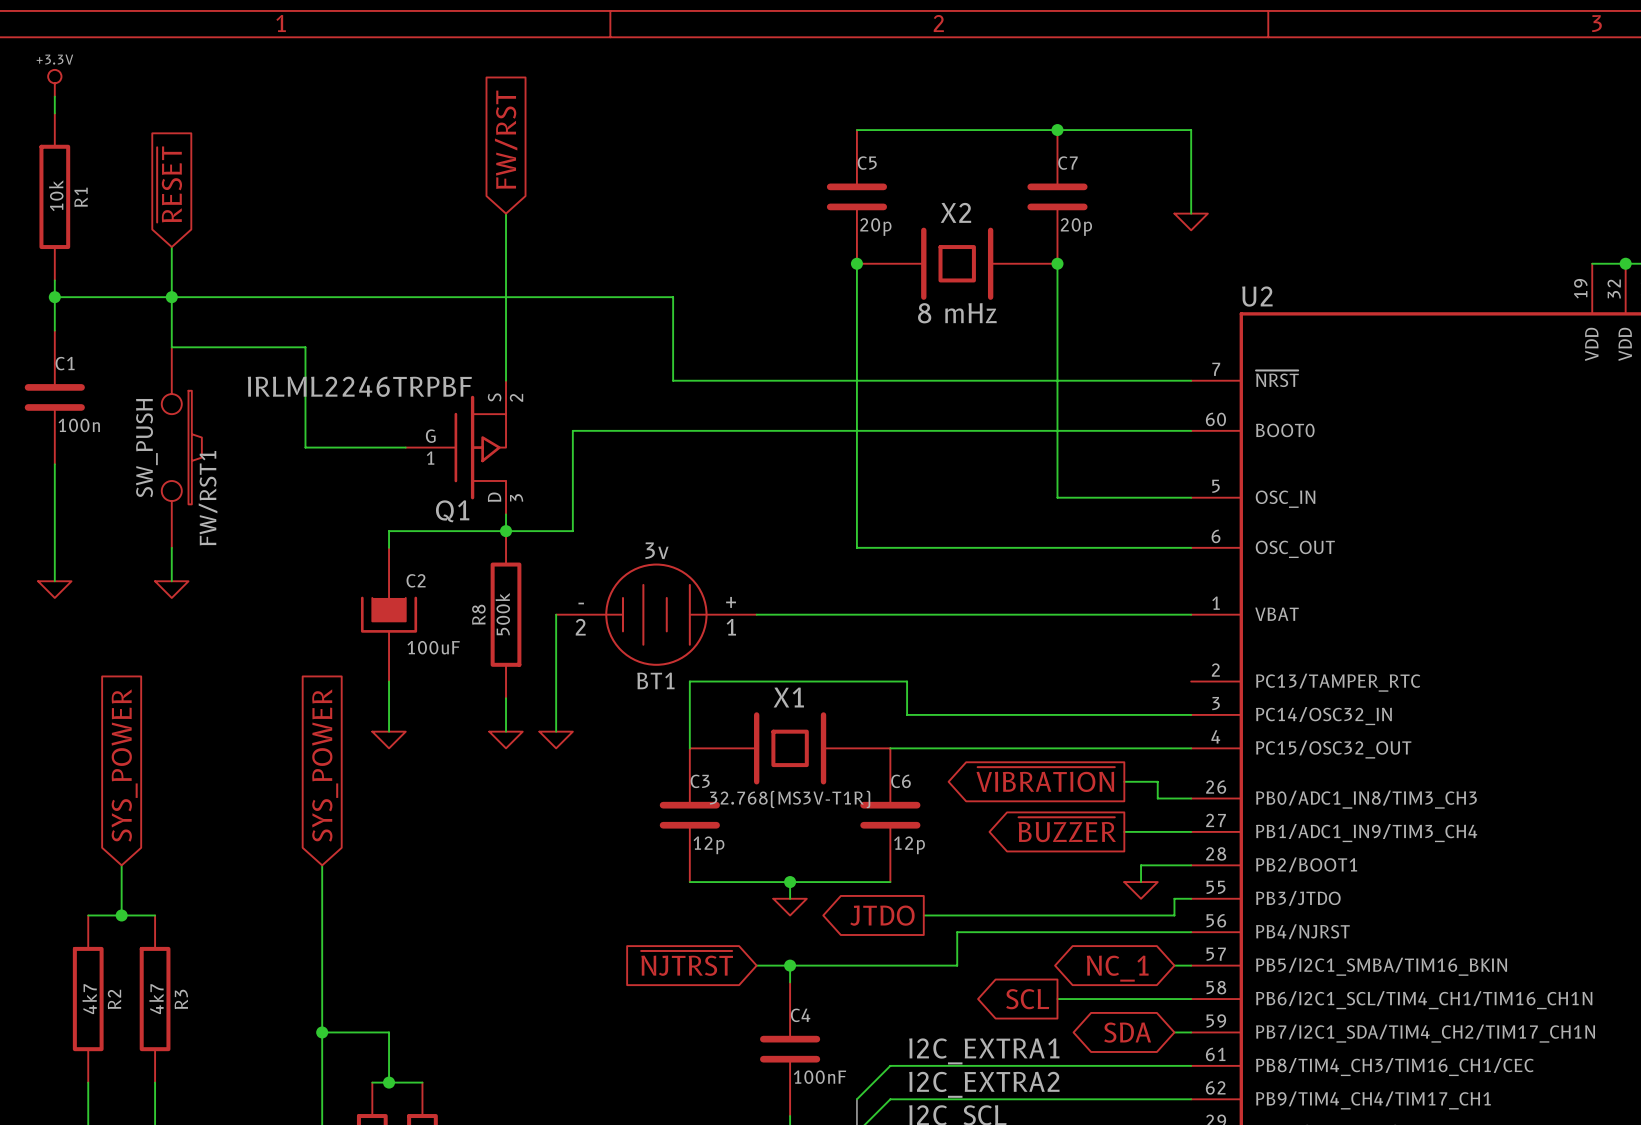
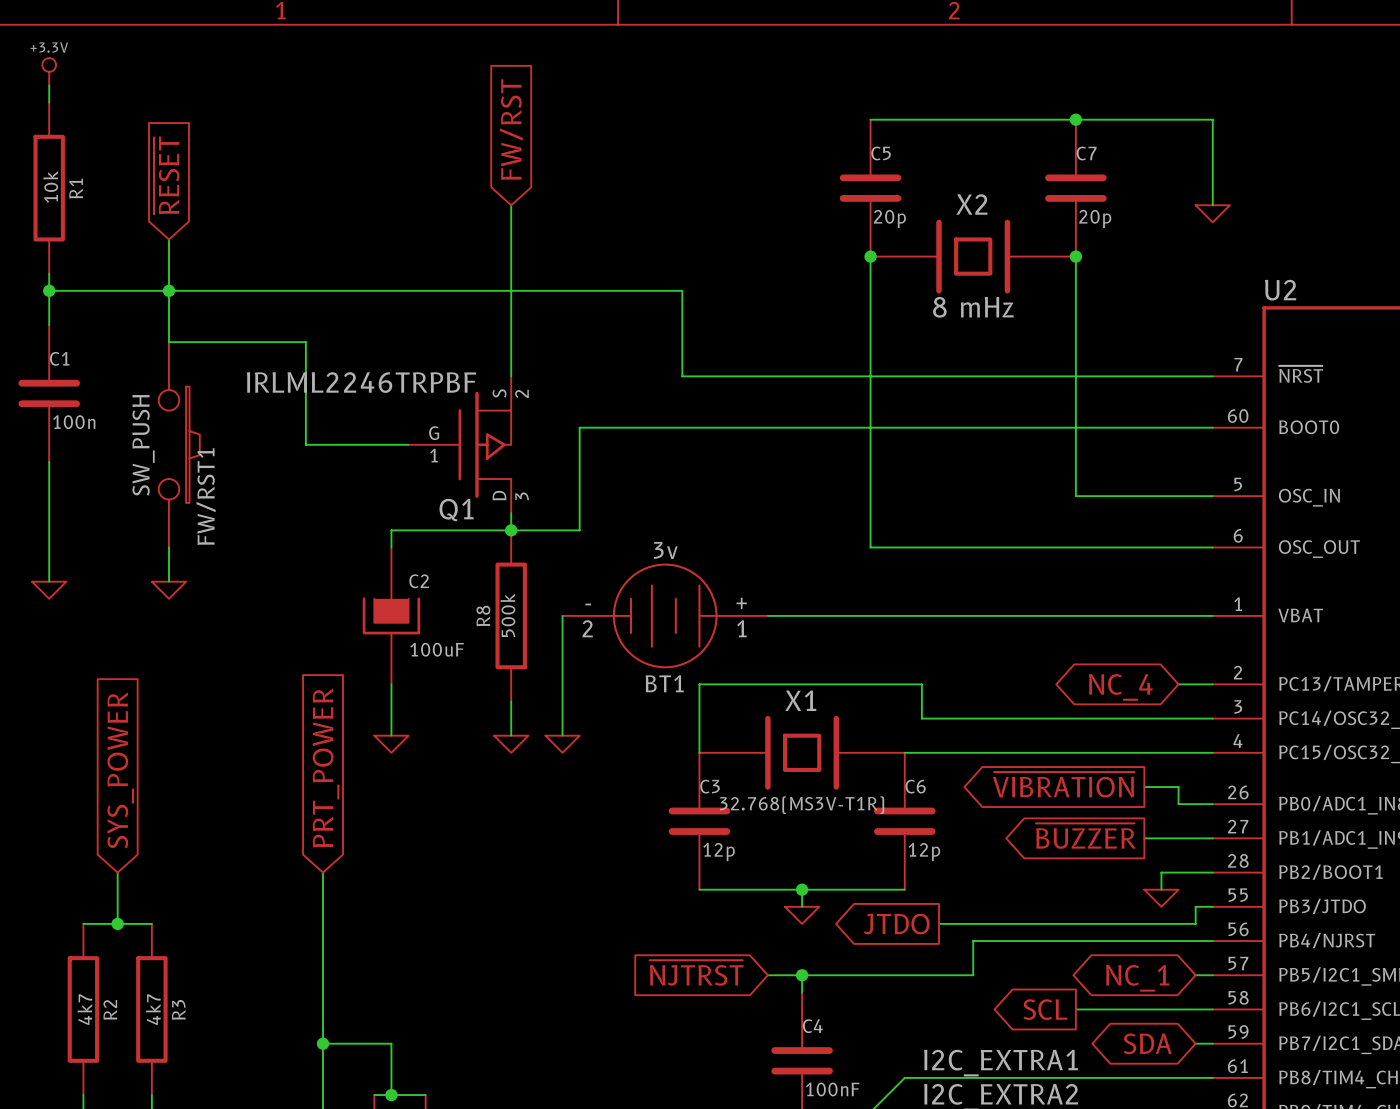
wire: none -> (1178, 684) (1212, 684)
global label: none -> NC_4 (1120, 687)
global label: SYS_POWER (325, 765) -> PRT_POWER (326, 767)

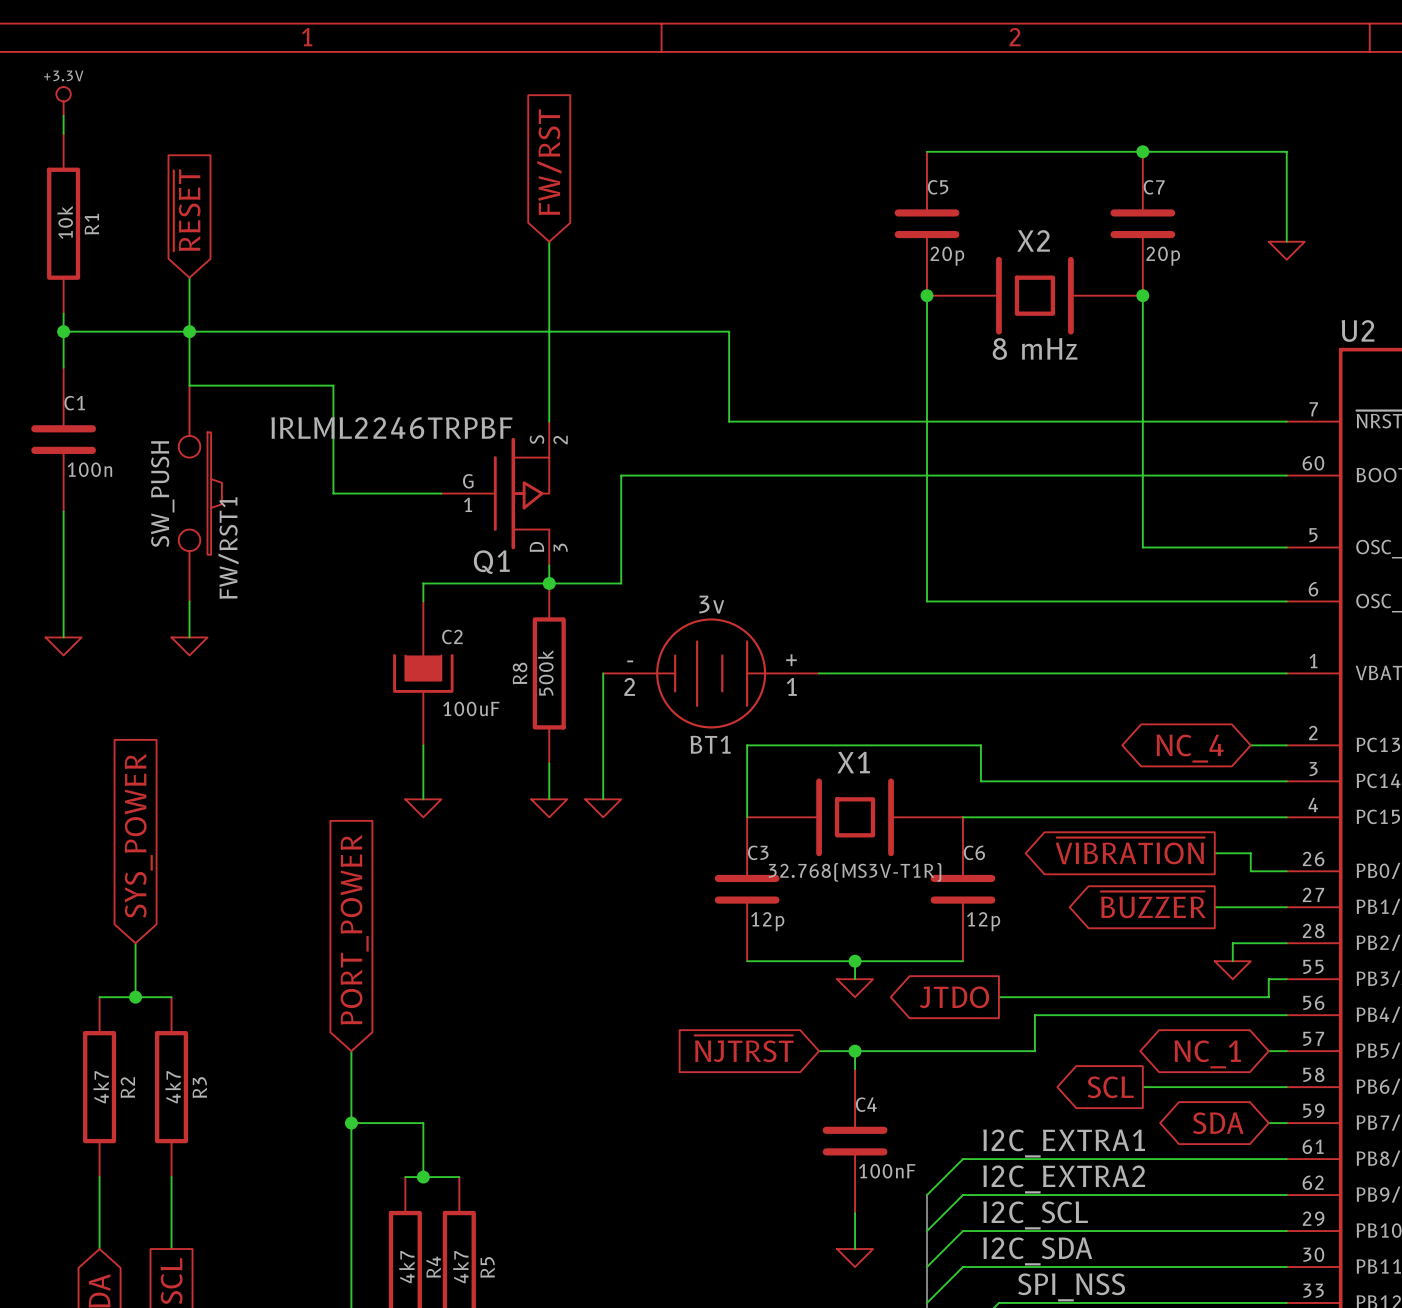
global label: PRT_POWER (326, 767) -> PORT_POWER (354, 929)
wire: (322, 872) (322, 975) -> none

